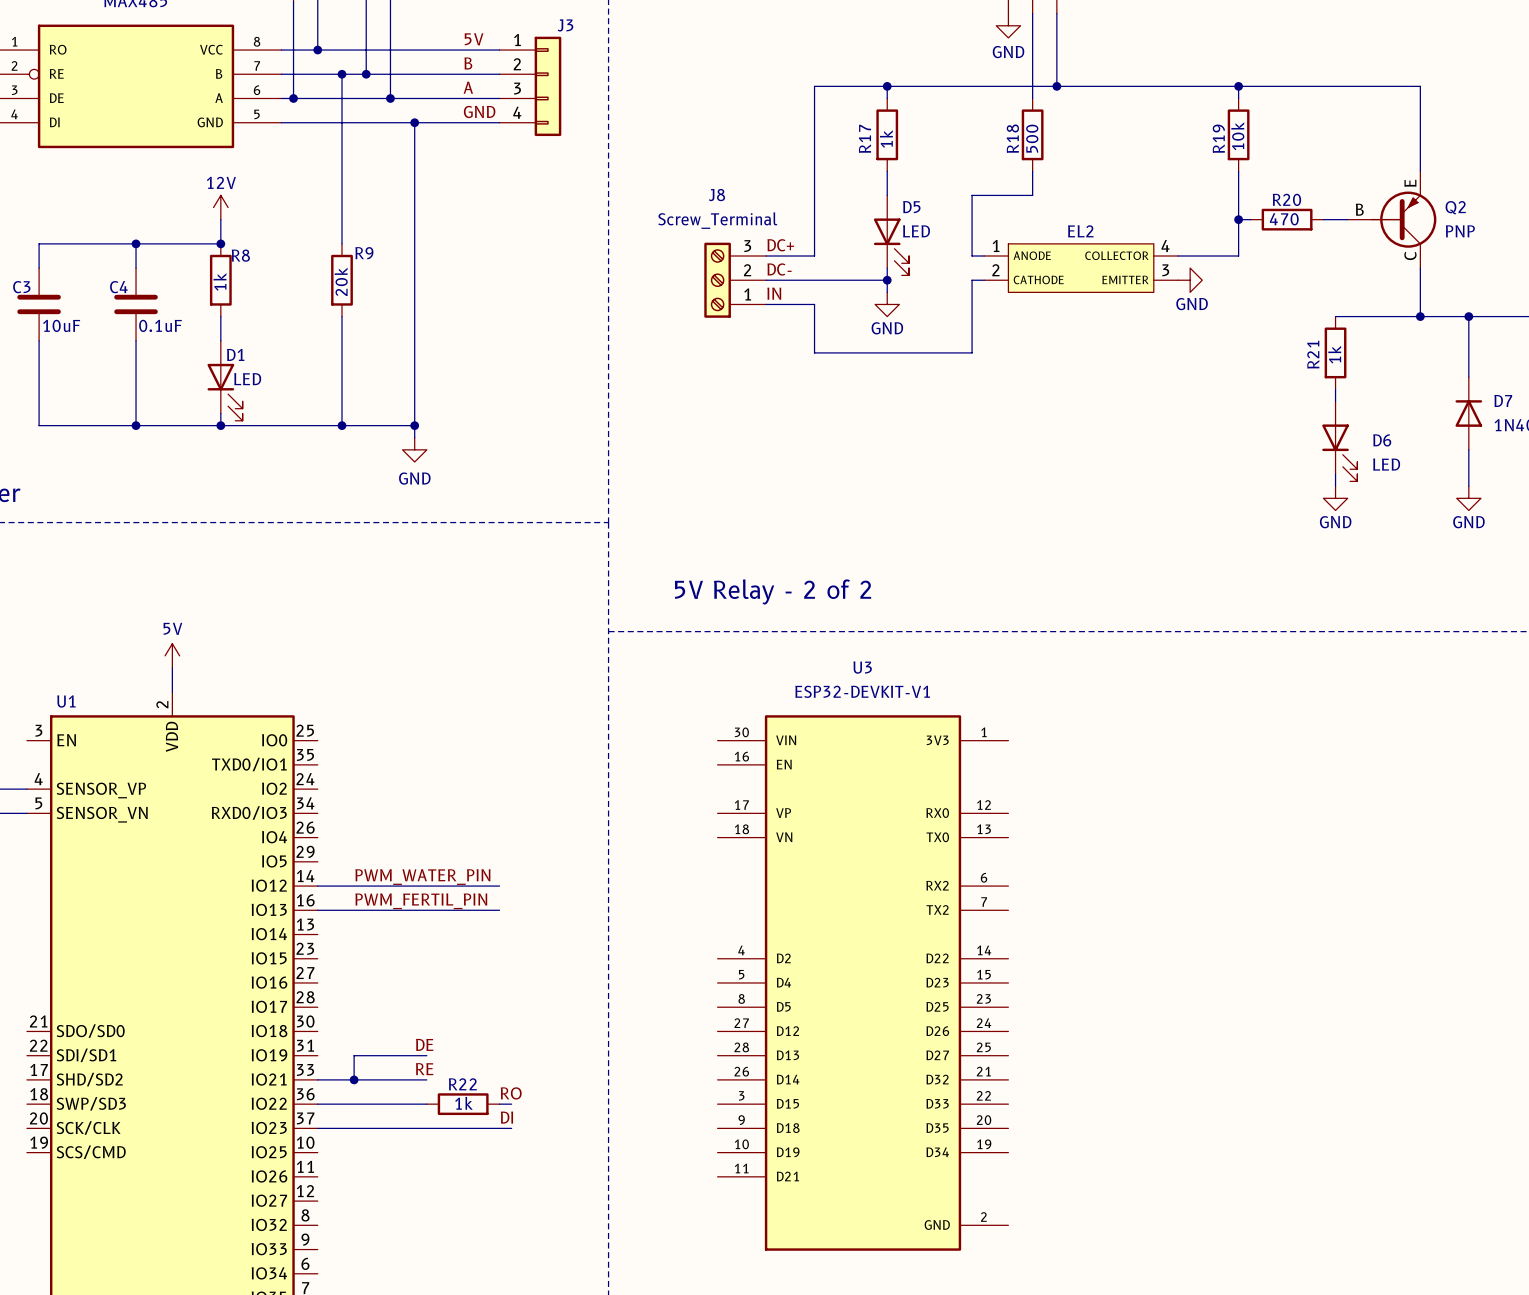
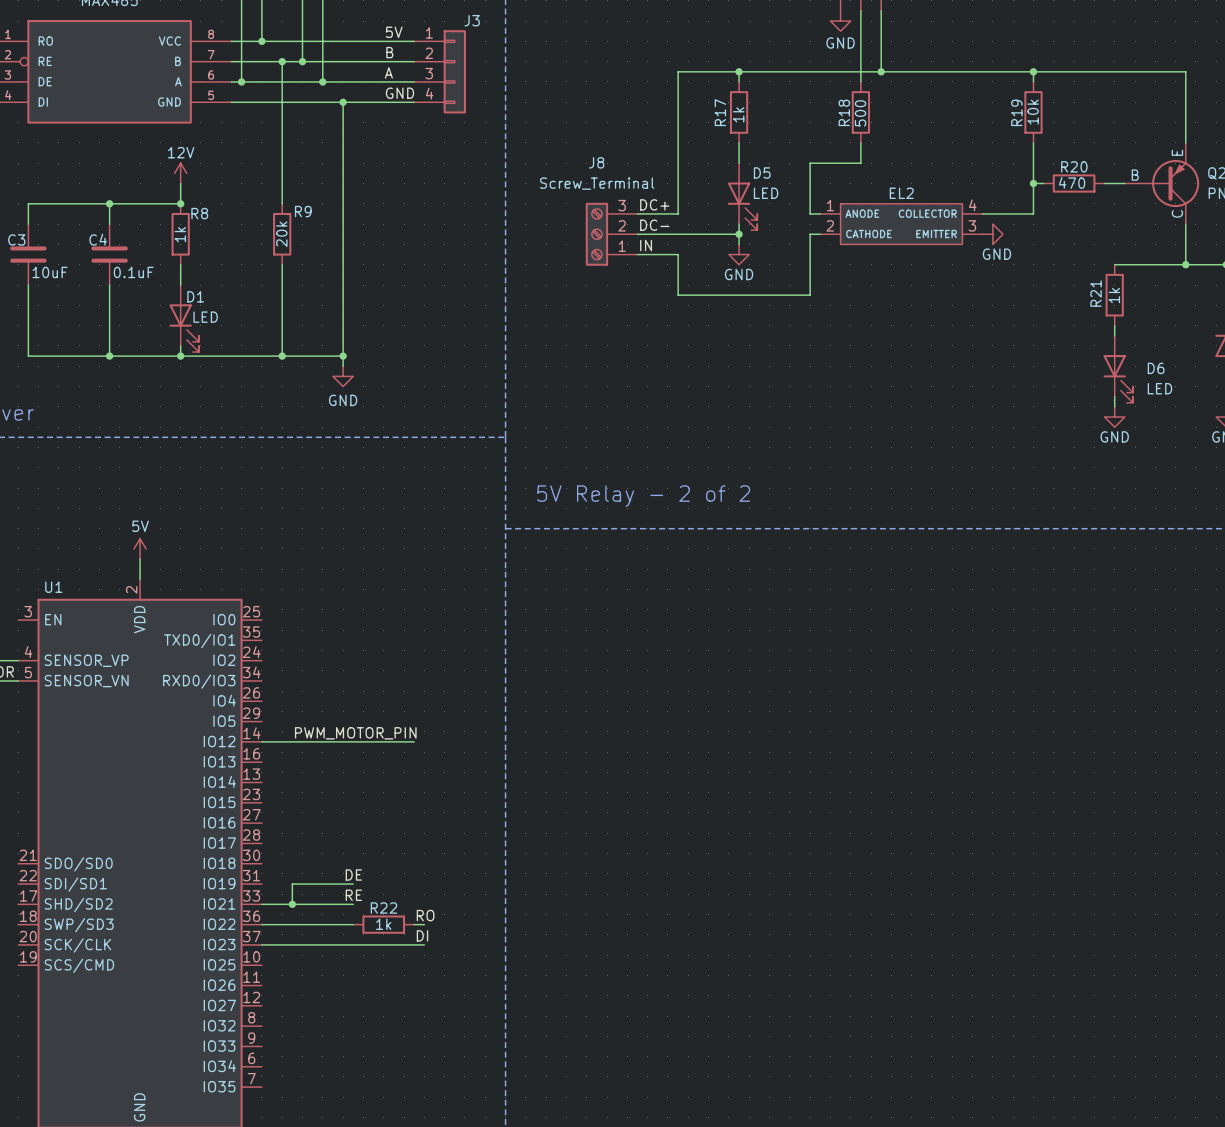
label: PWM_WATER_PIN (422, 877) -> PWM_MOTOR_PIN (355, 733)
label: PWM_FERTIL_PIN (421, 901) -> none
wire: (317, 910) (499, 910) -> none
U3: ESP32-DEVKIT-V1 (863, 982) -> none

